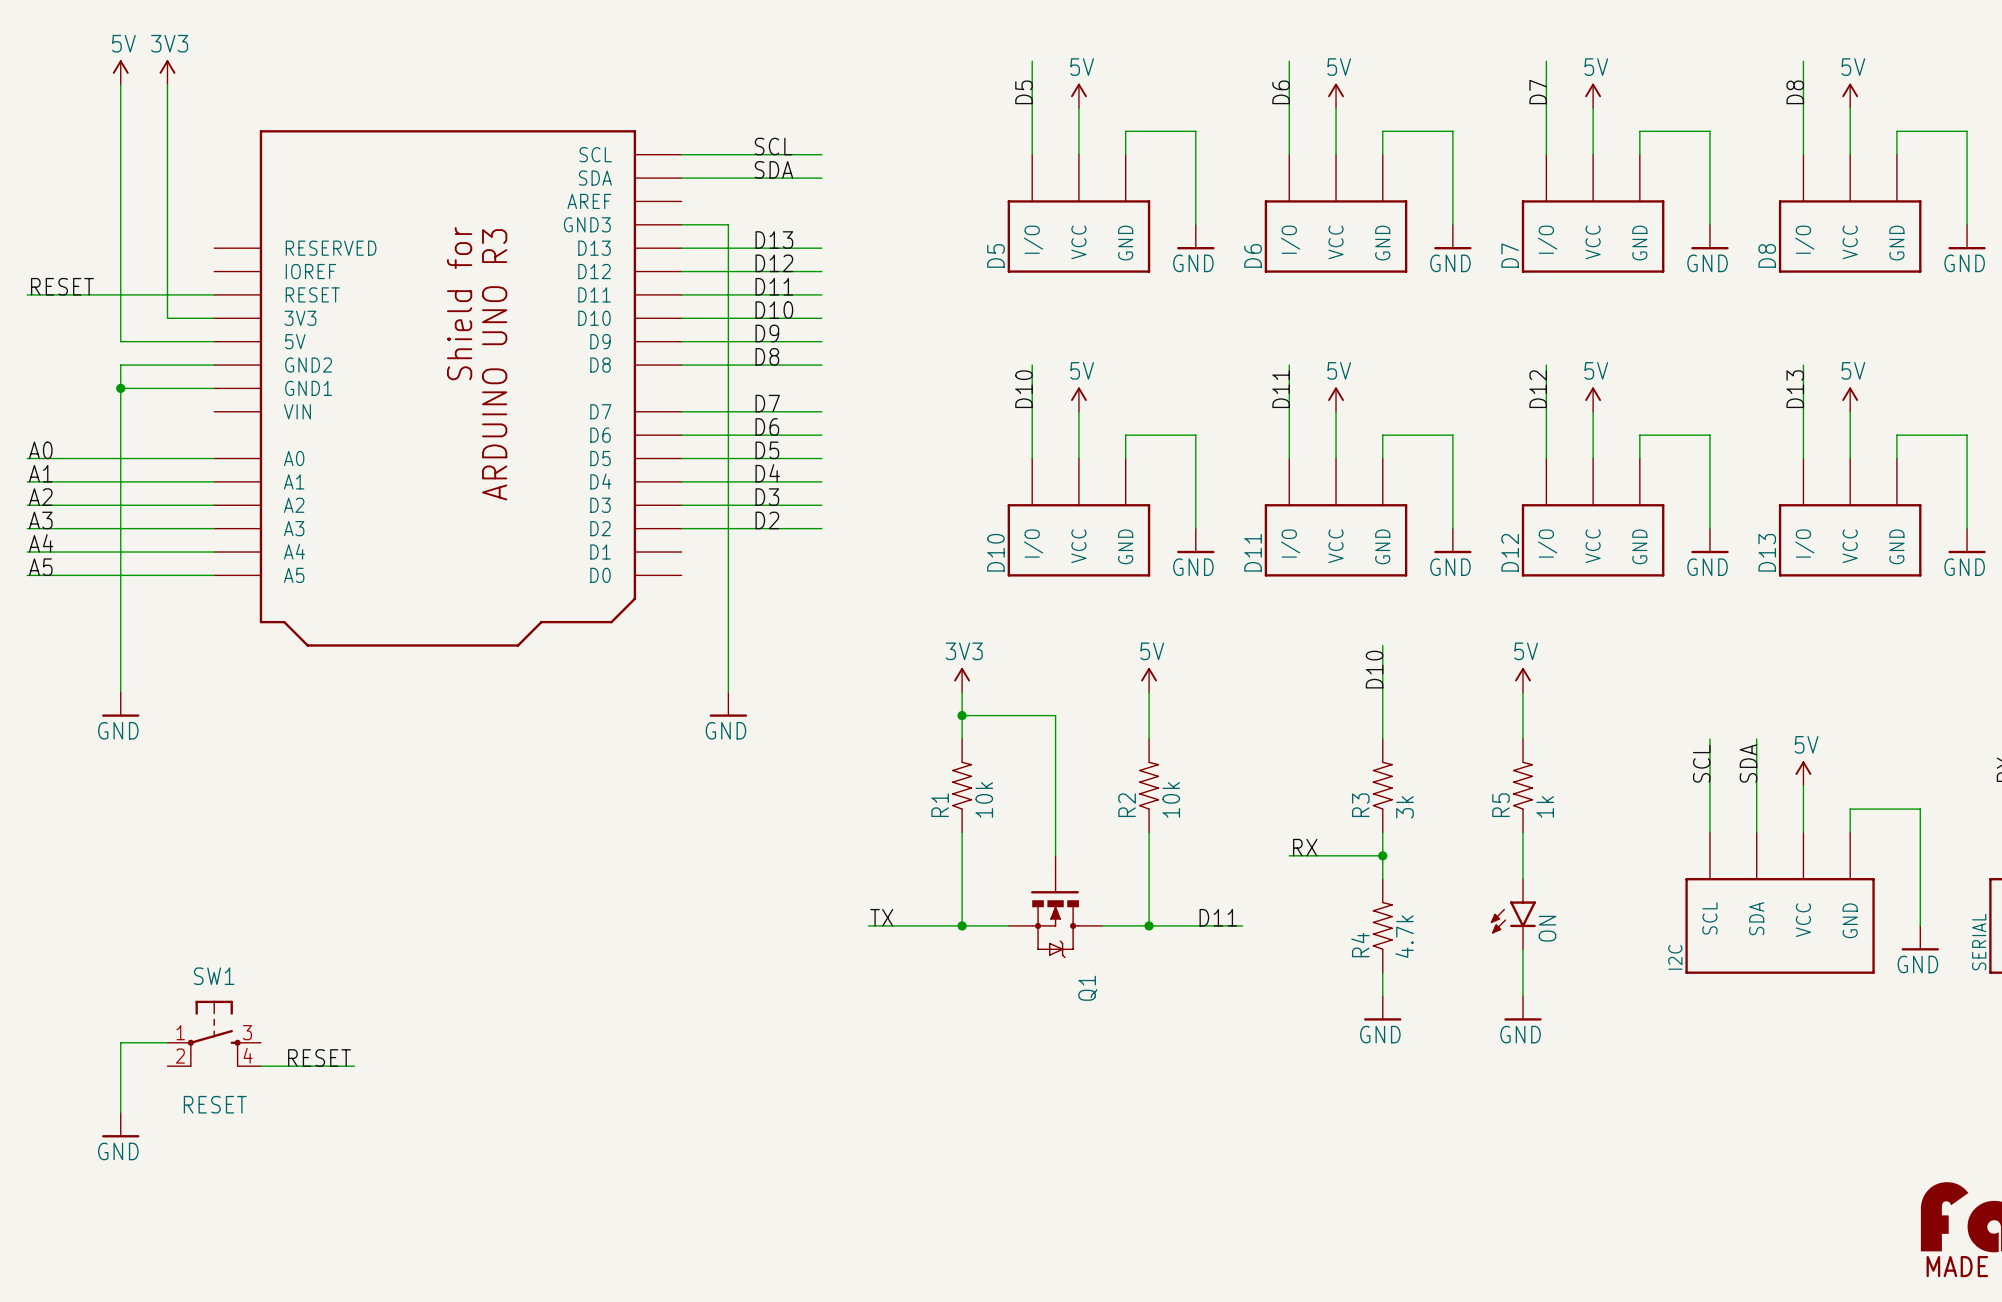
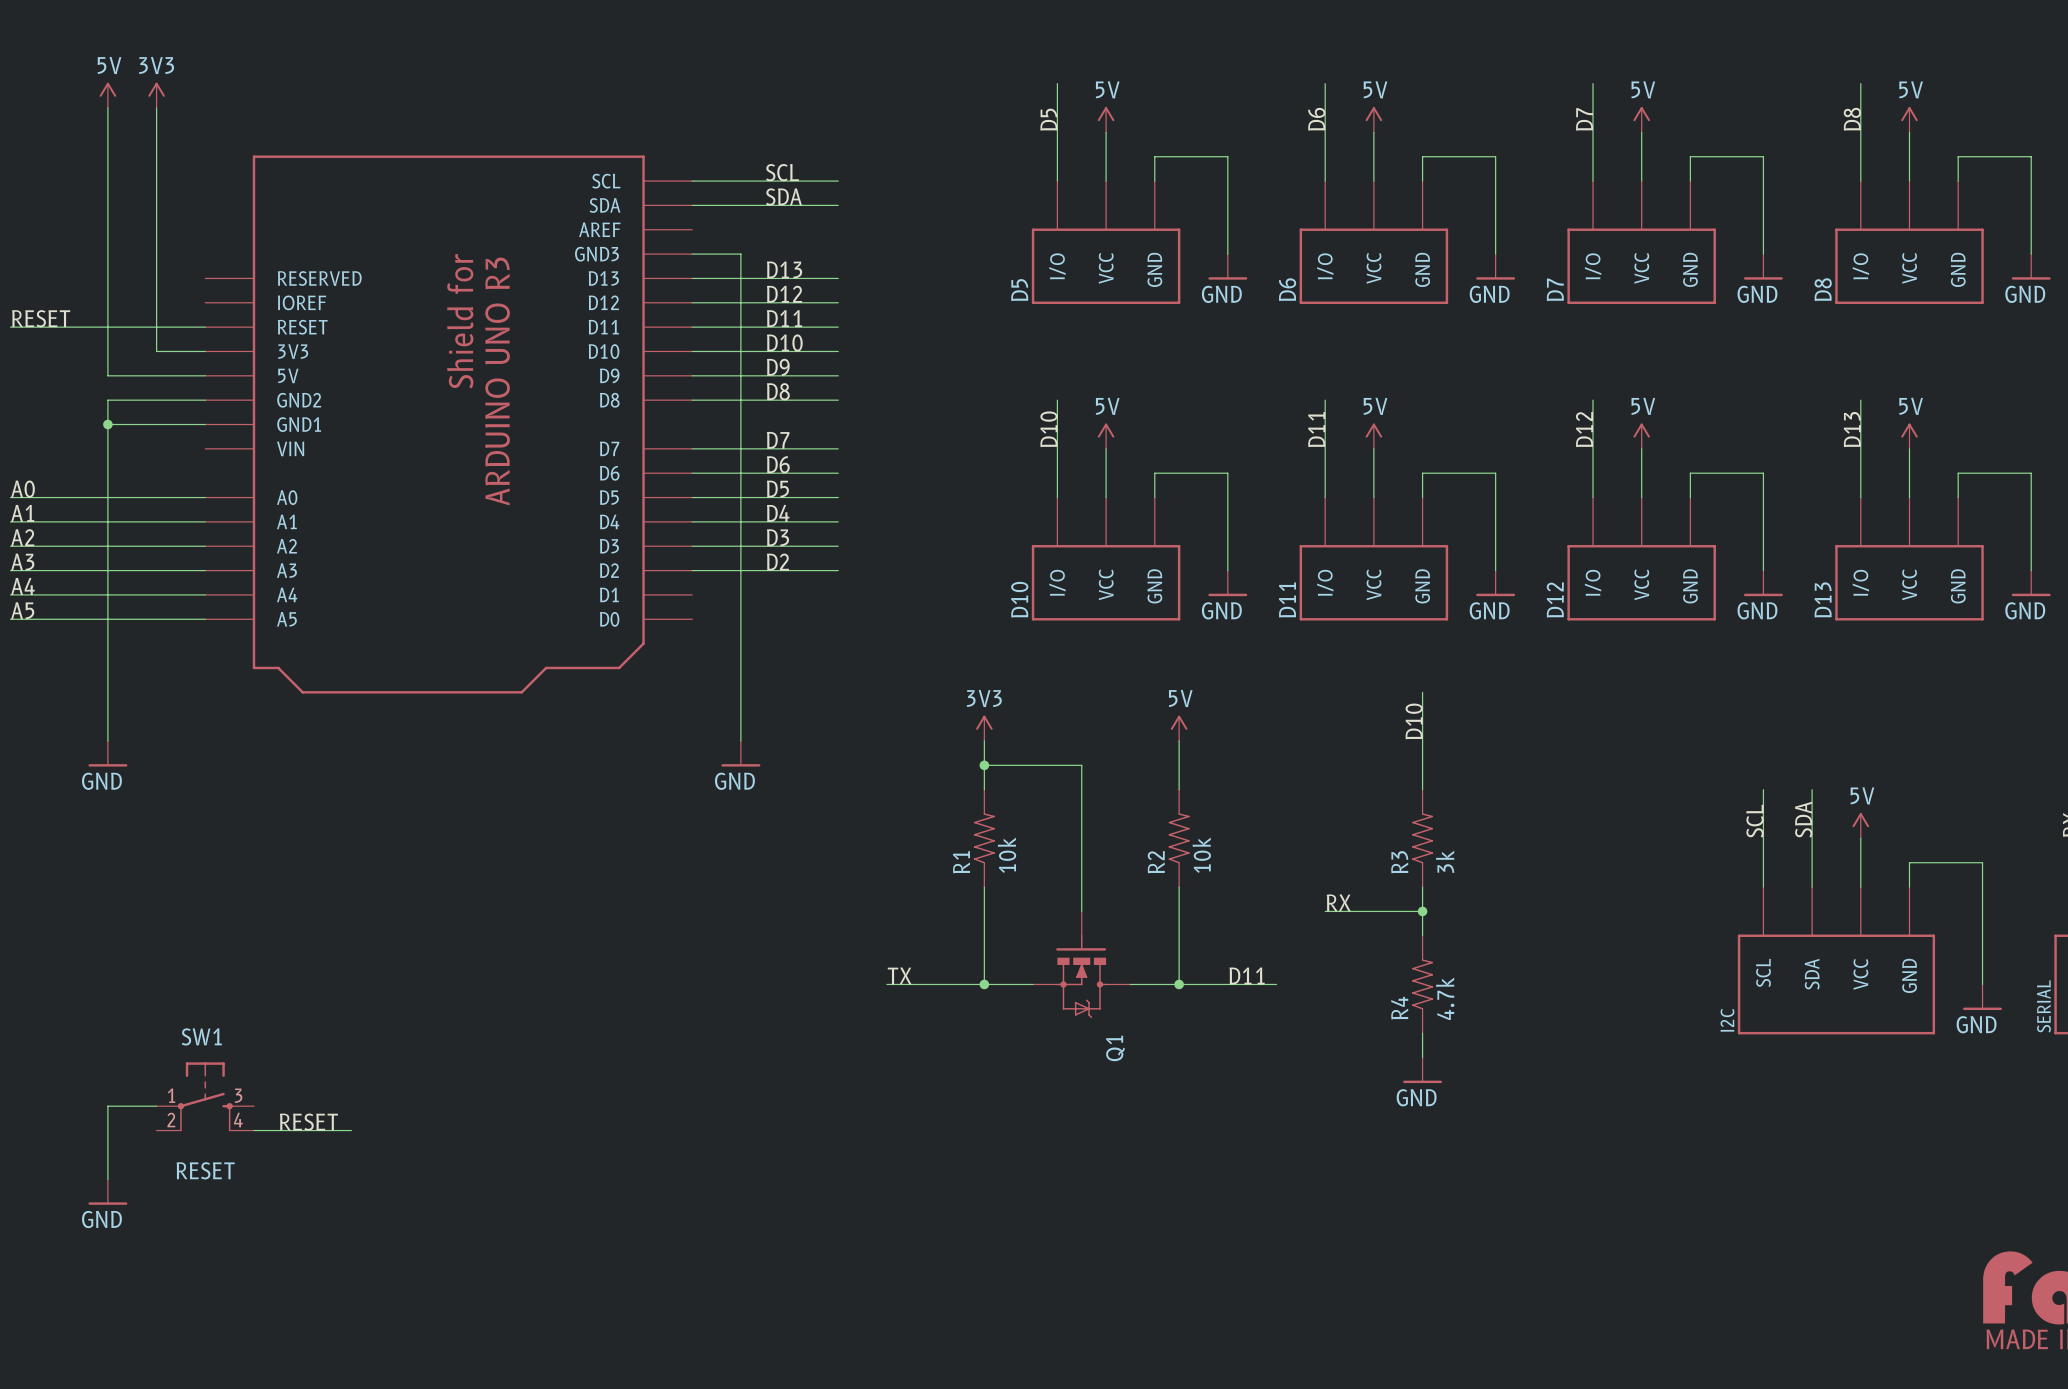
power symbol: 5V (1522, 680) -> none
wire: (1522, 692) (1522, 738) -> none
R5: 1k (1522, 785) -> none
wire: (1522, 832) (1522, 879) -> none
ON: (1513, 914) -> none
wire: (1522, 949) (1522, 996) -> none
power symbol: GND (1522, 1008) -> none

